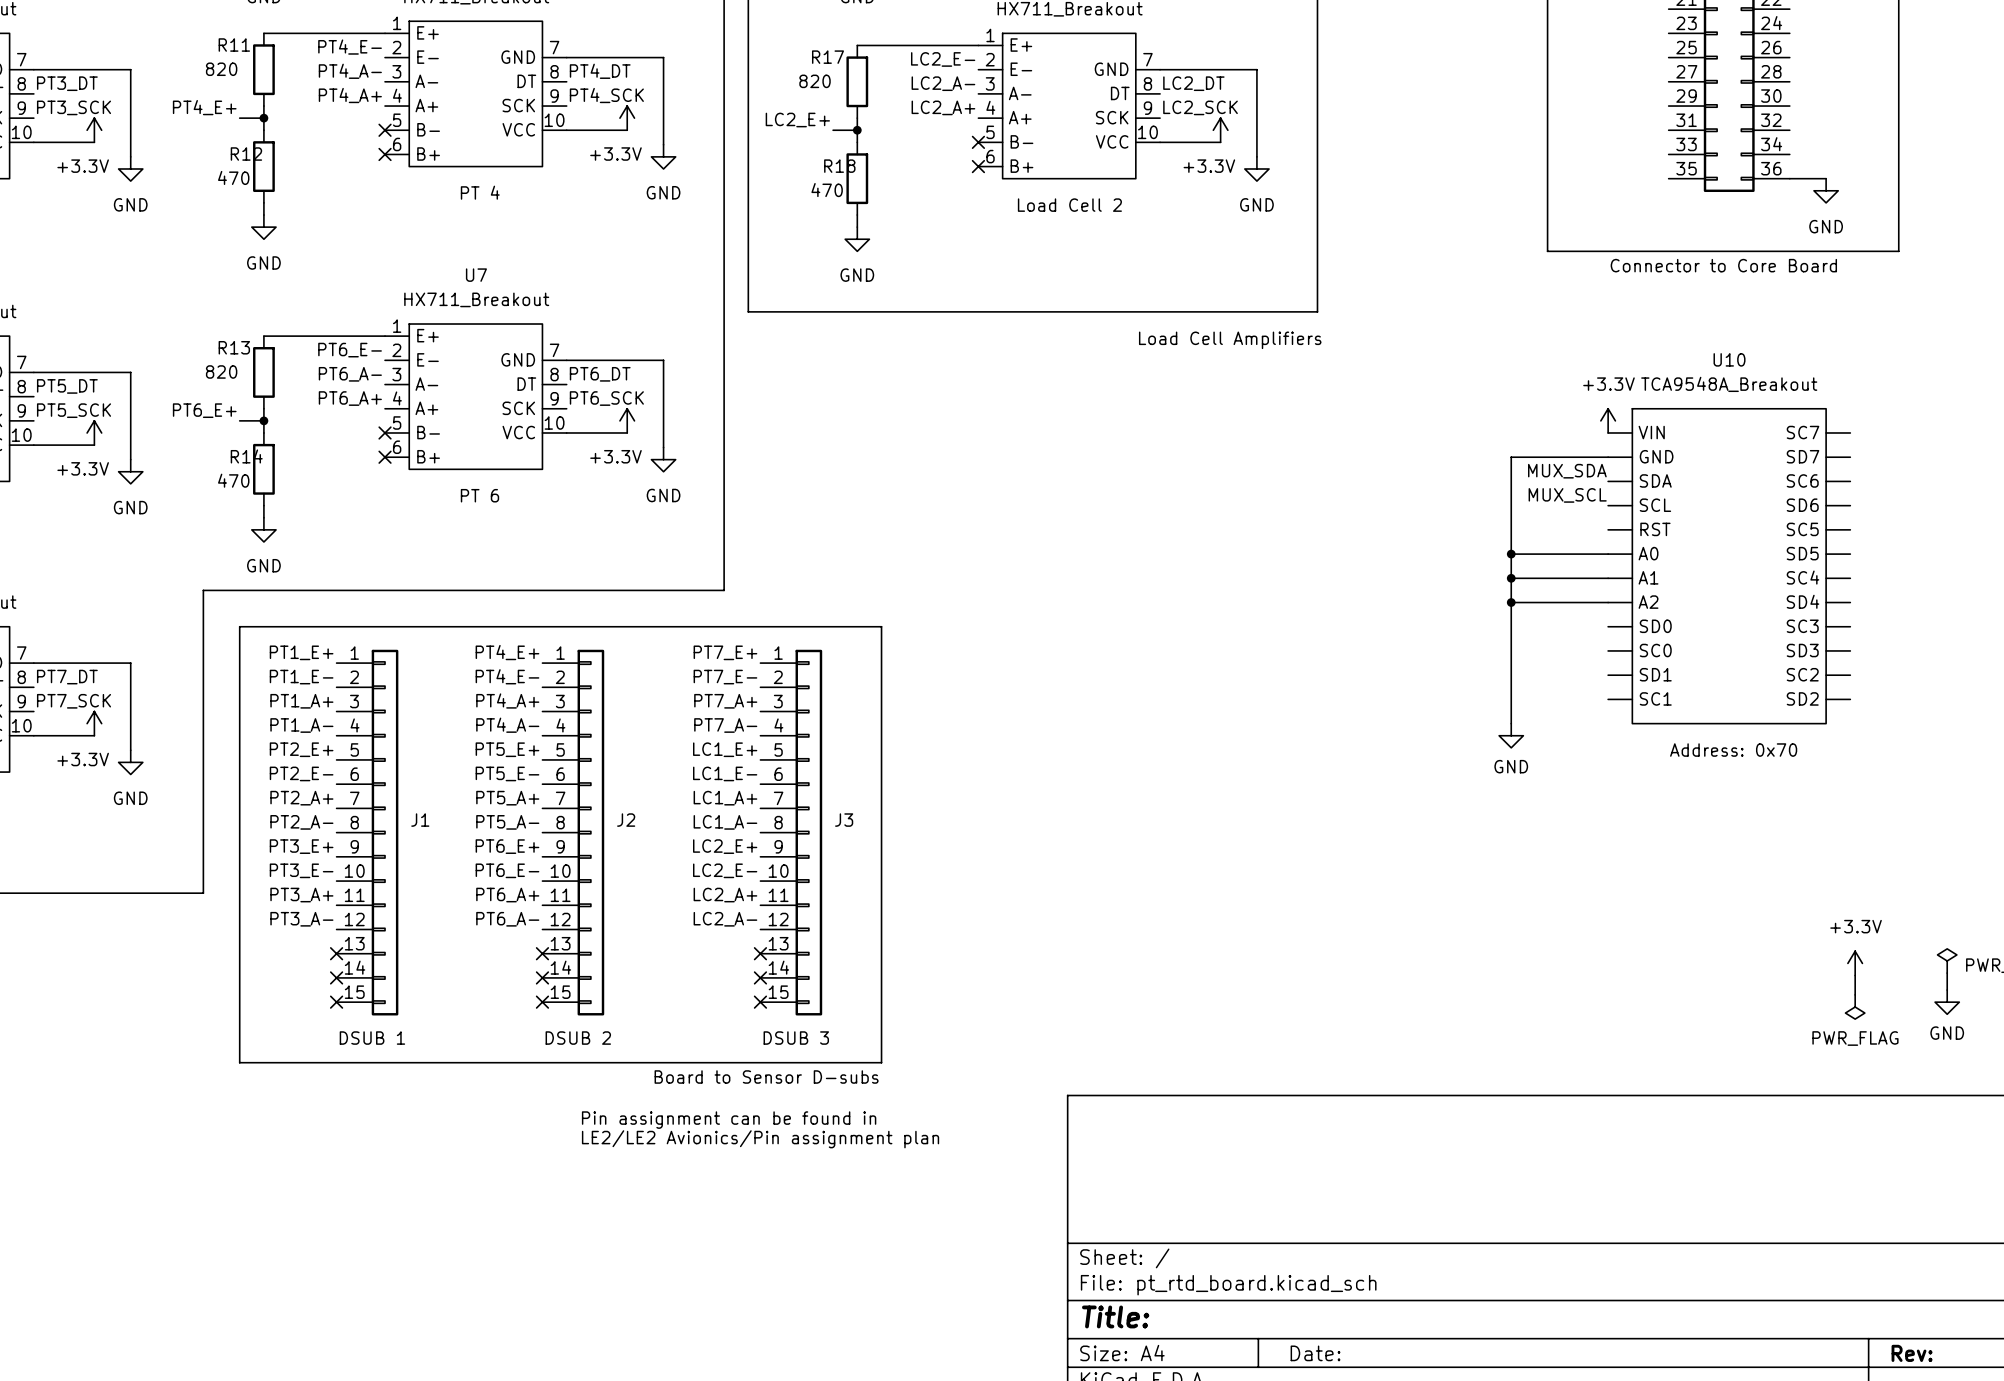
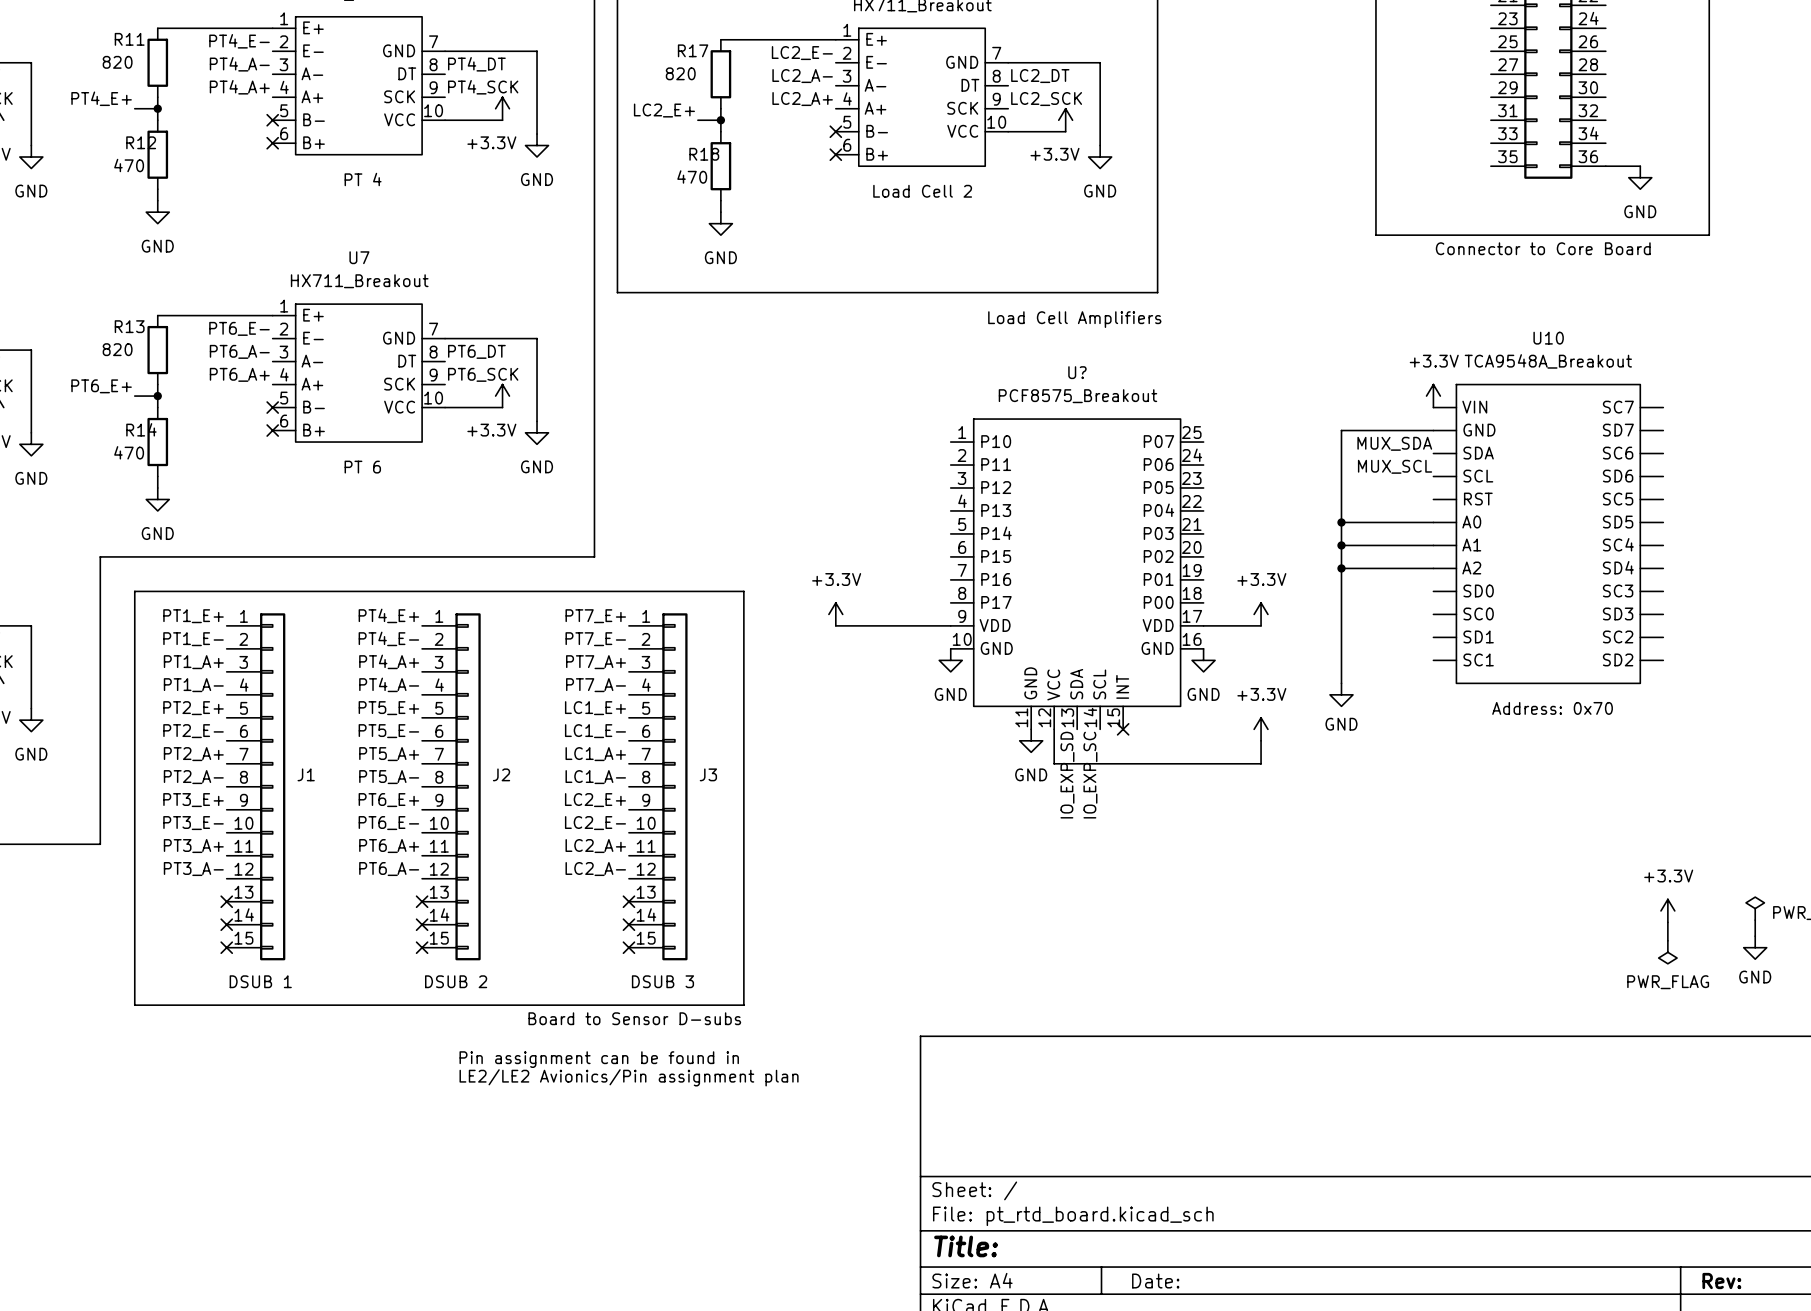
U?: none -> PCF8575_Breakout (1077, 574)
power symbol: none -> +3.3V (835, 614)
power symbol: none -> +3.3V (1261, 614)
wire: none -> (835, 625) (950, 625)
wire: none -> (1203, 625) (1261, 625)
power symbol: none -> GND (950, 660)
power symbol: none -> GND (1203, 660)
wire: none -> (1054, 729) (1054, 763) (1261, 763) (1261, 740)
no-connect mark: none -> (1123, 729)
power symbol: none -> +3.3V (1261, 729)
power symbol: none -> GND (1031, 740)
label: none -> IO_EXP_SD (1067, 775)
label: none -> IO_EXP_SC (1090, 775)

